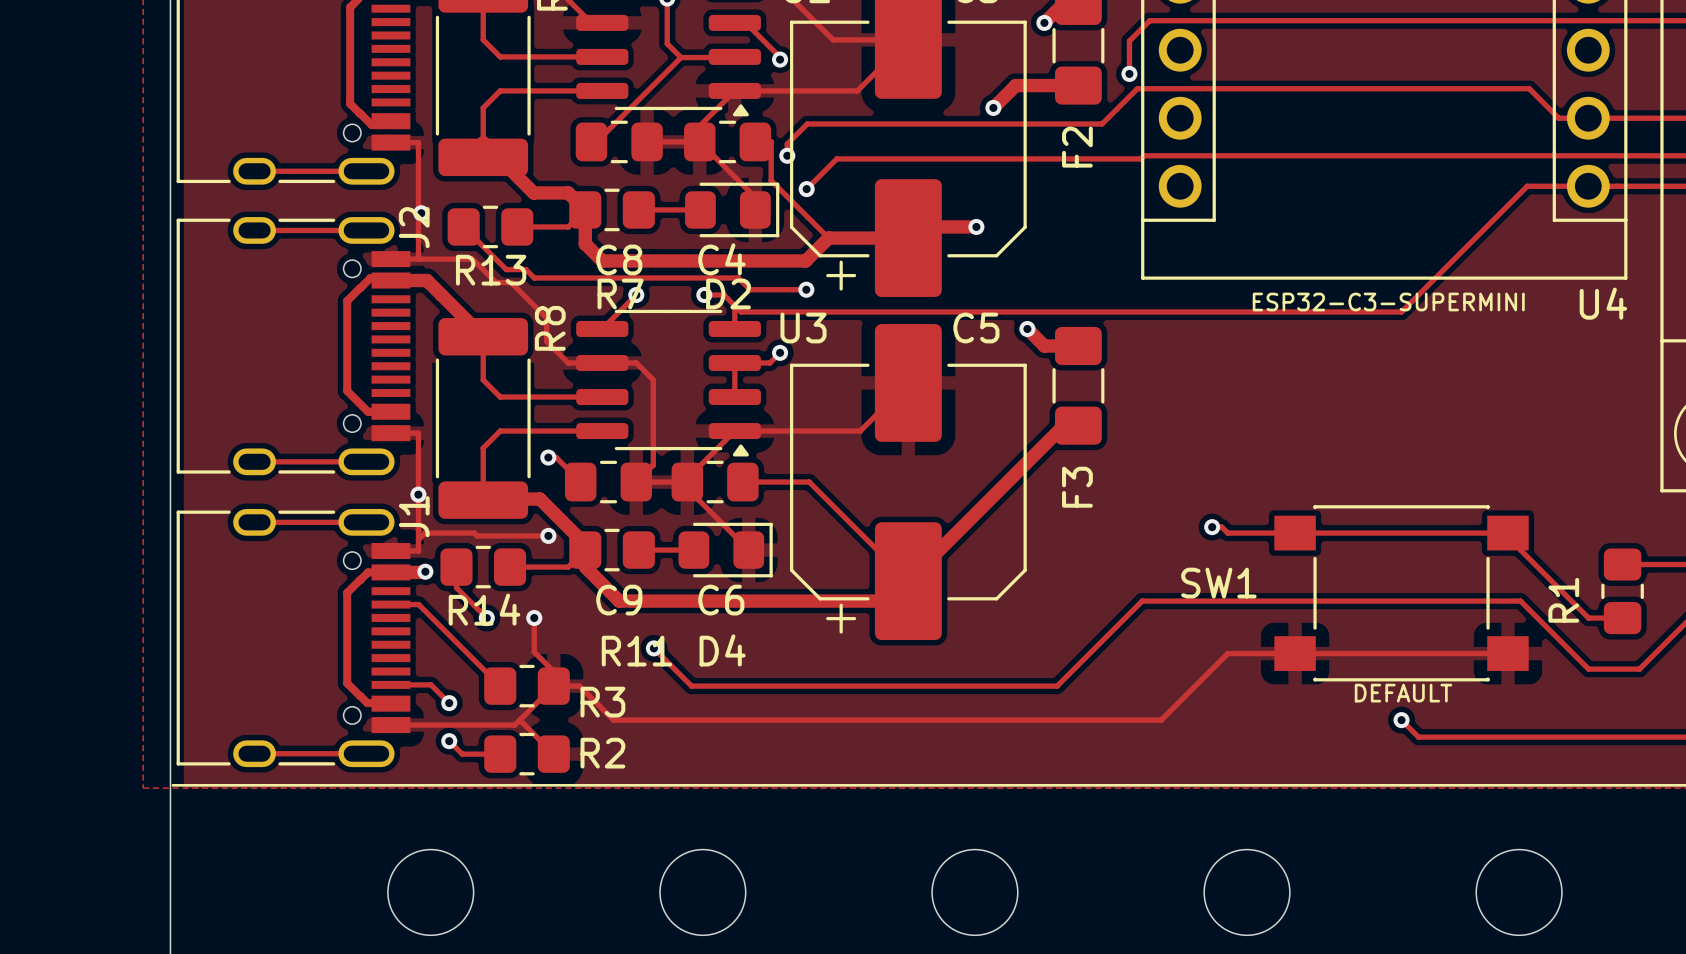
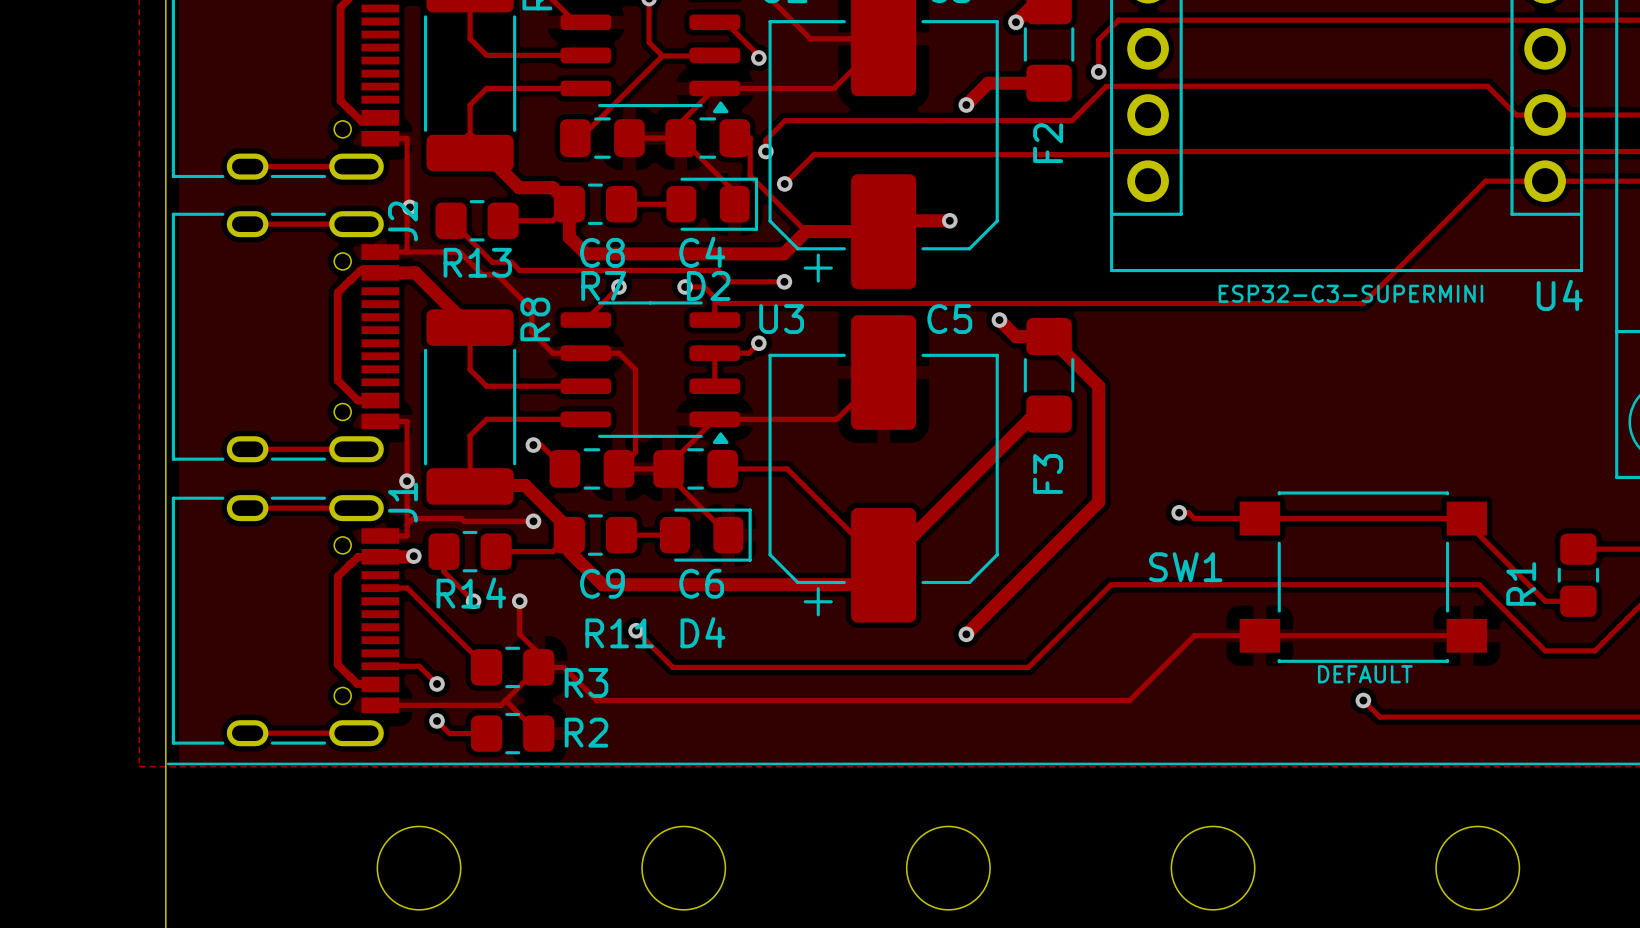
track: none -> (1049, 336) (1098, 386) (1098, 502) (966, 634)
via: none -> (966, 634)

